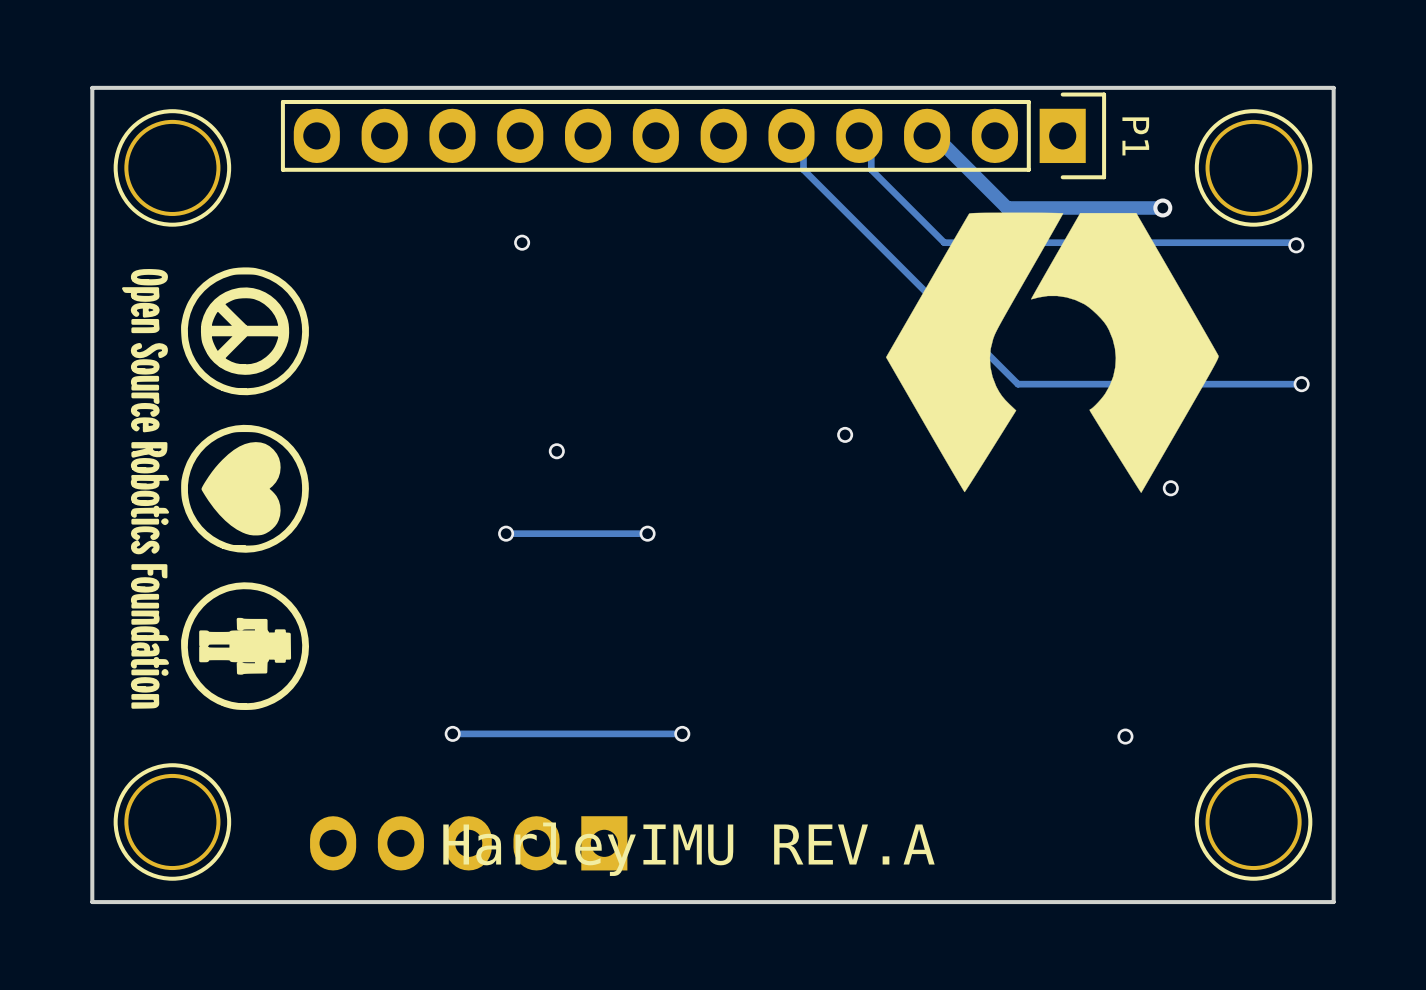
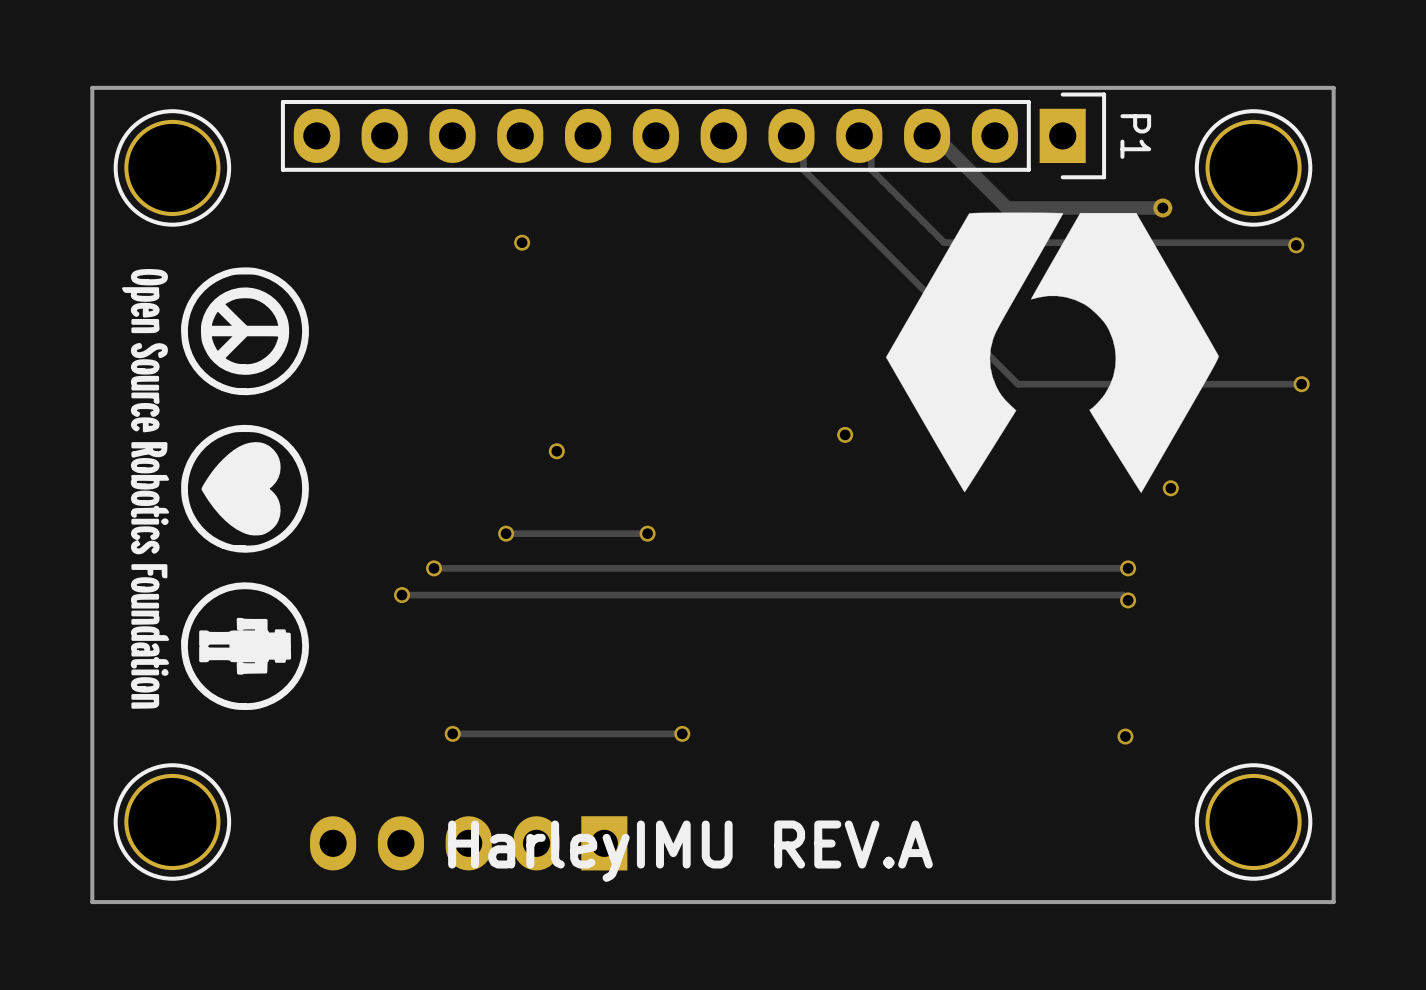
via: none -> (434, 568)
track: none -> (1128, 568) (434, 568)
via: none -> (1128, 568)
track: none -> (401, 595) (1122, 595) (1128, 600)
via: none -> (401, 595)
via: none -> (1128, 600)

